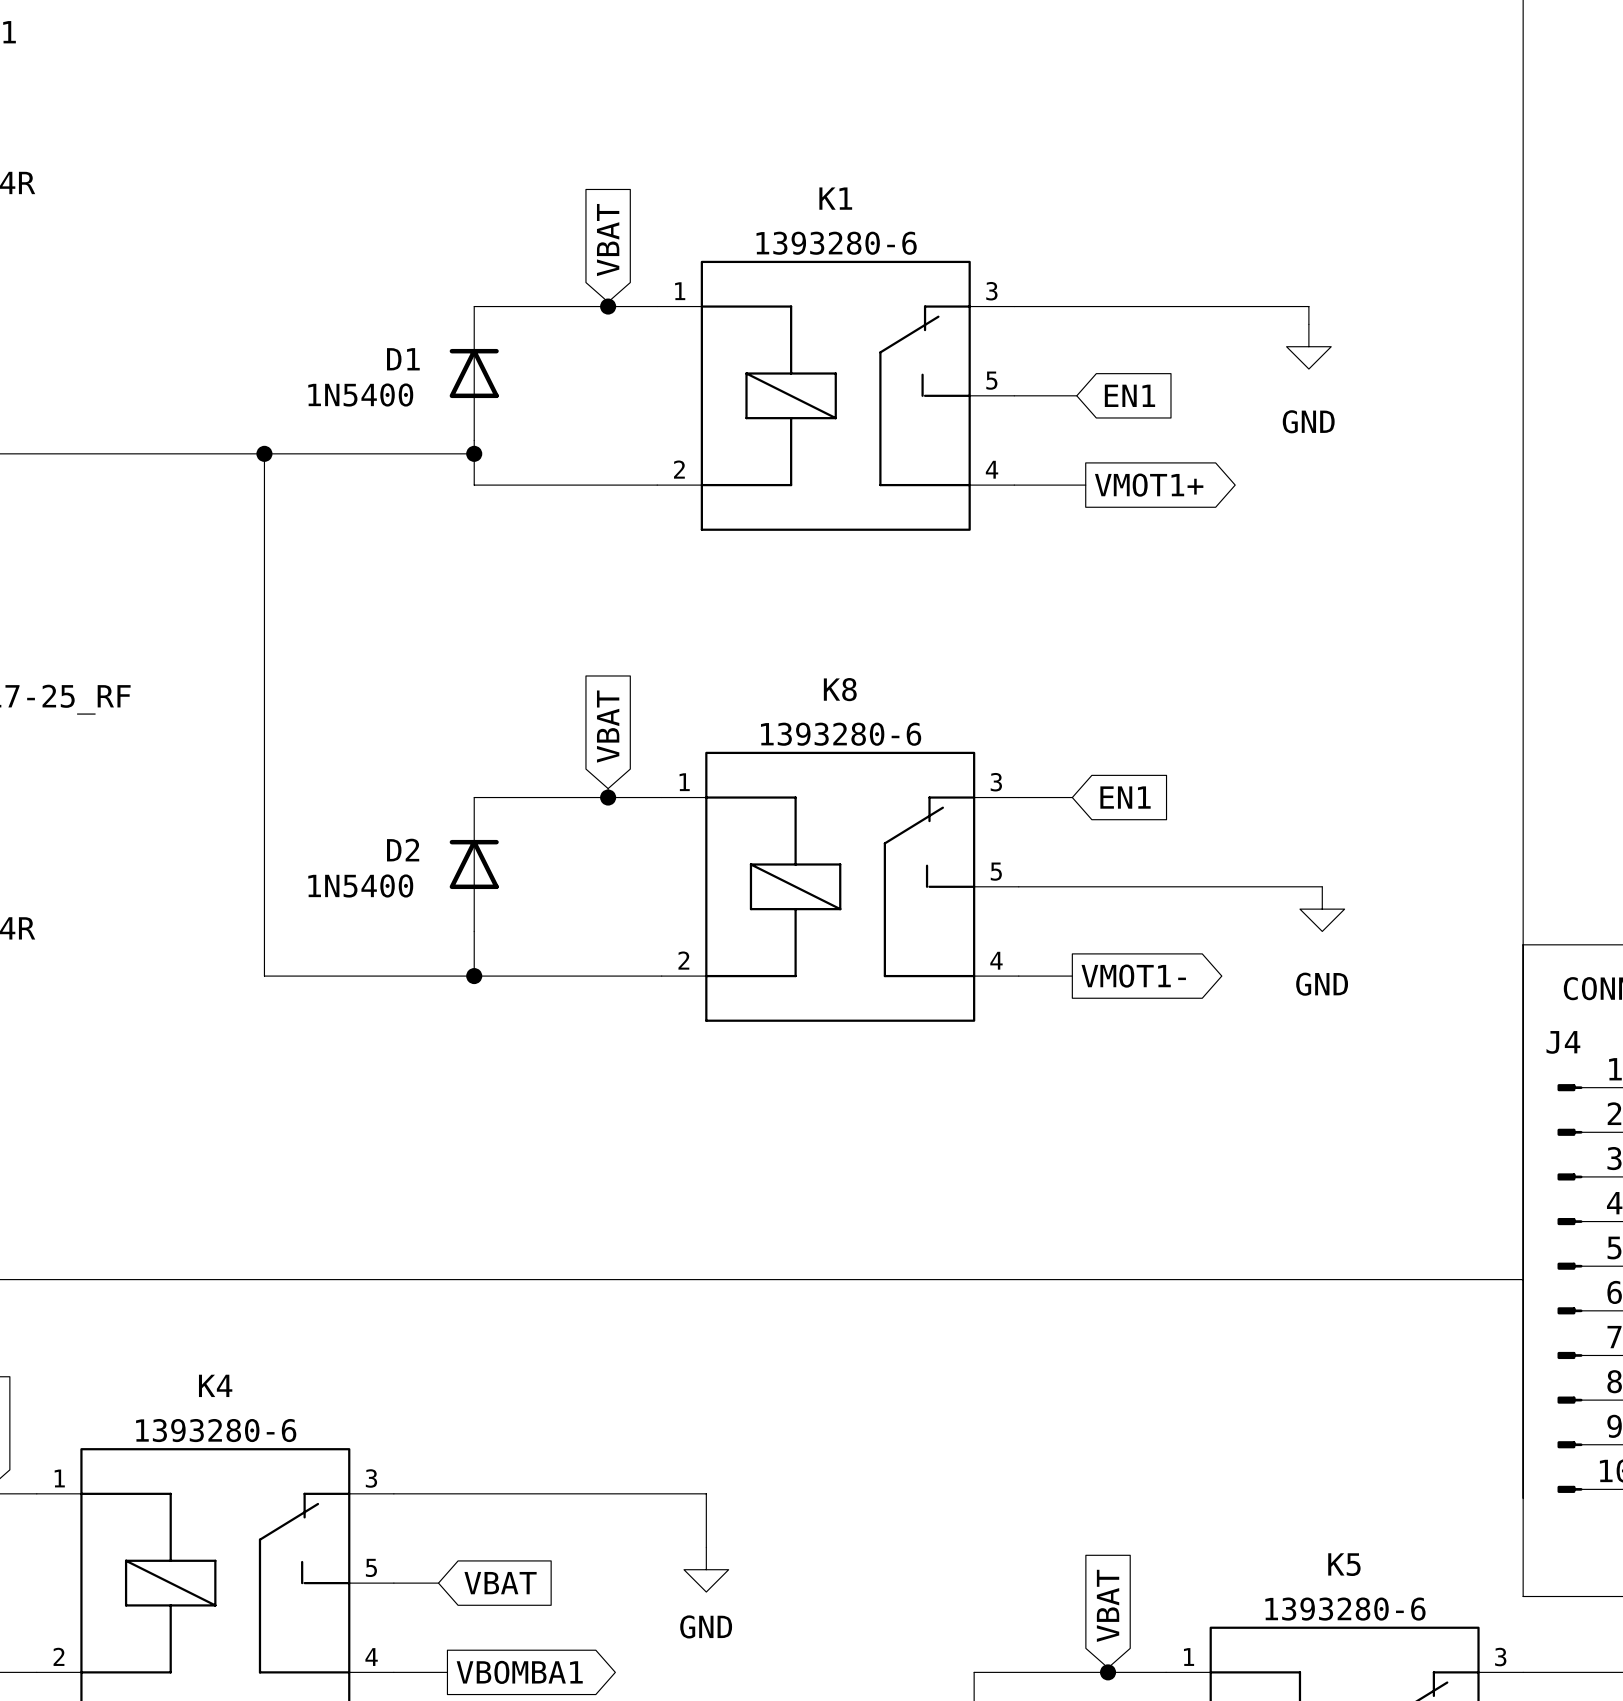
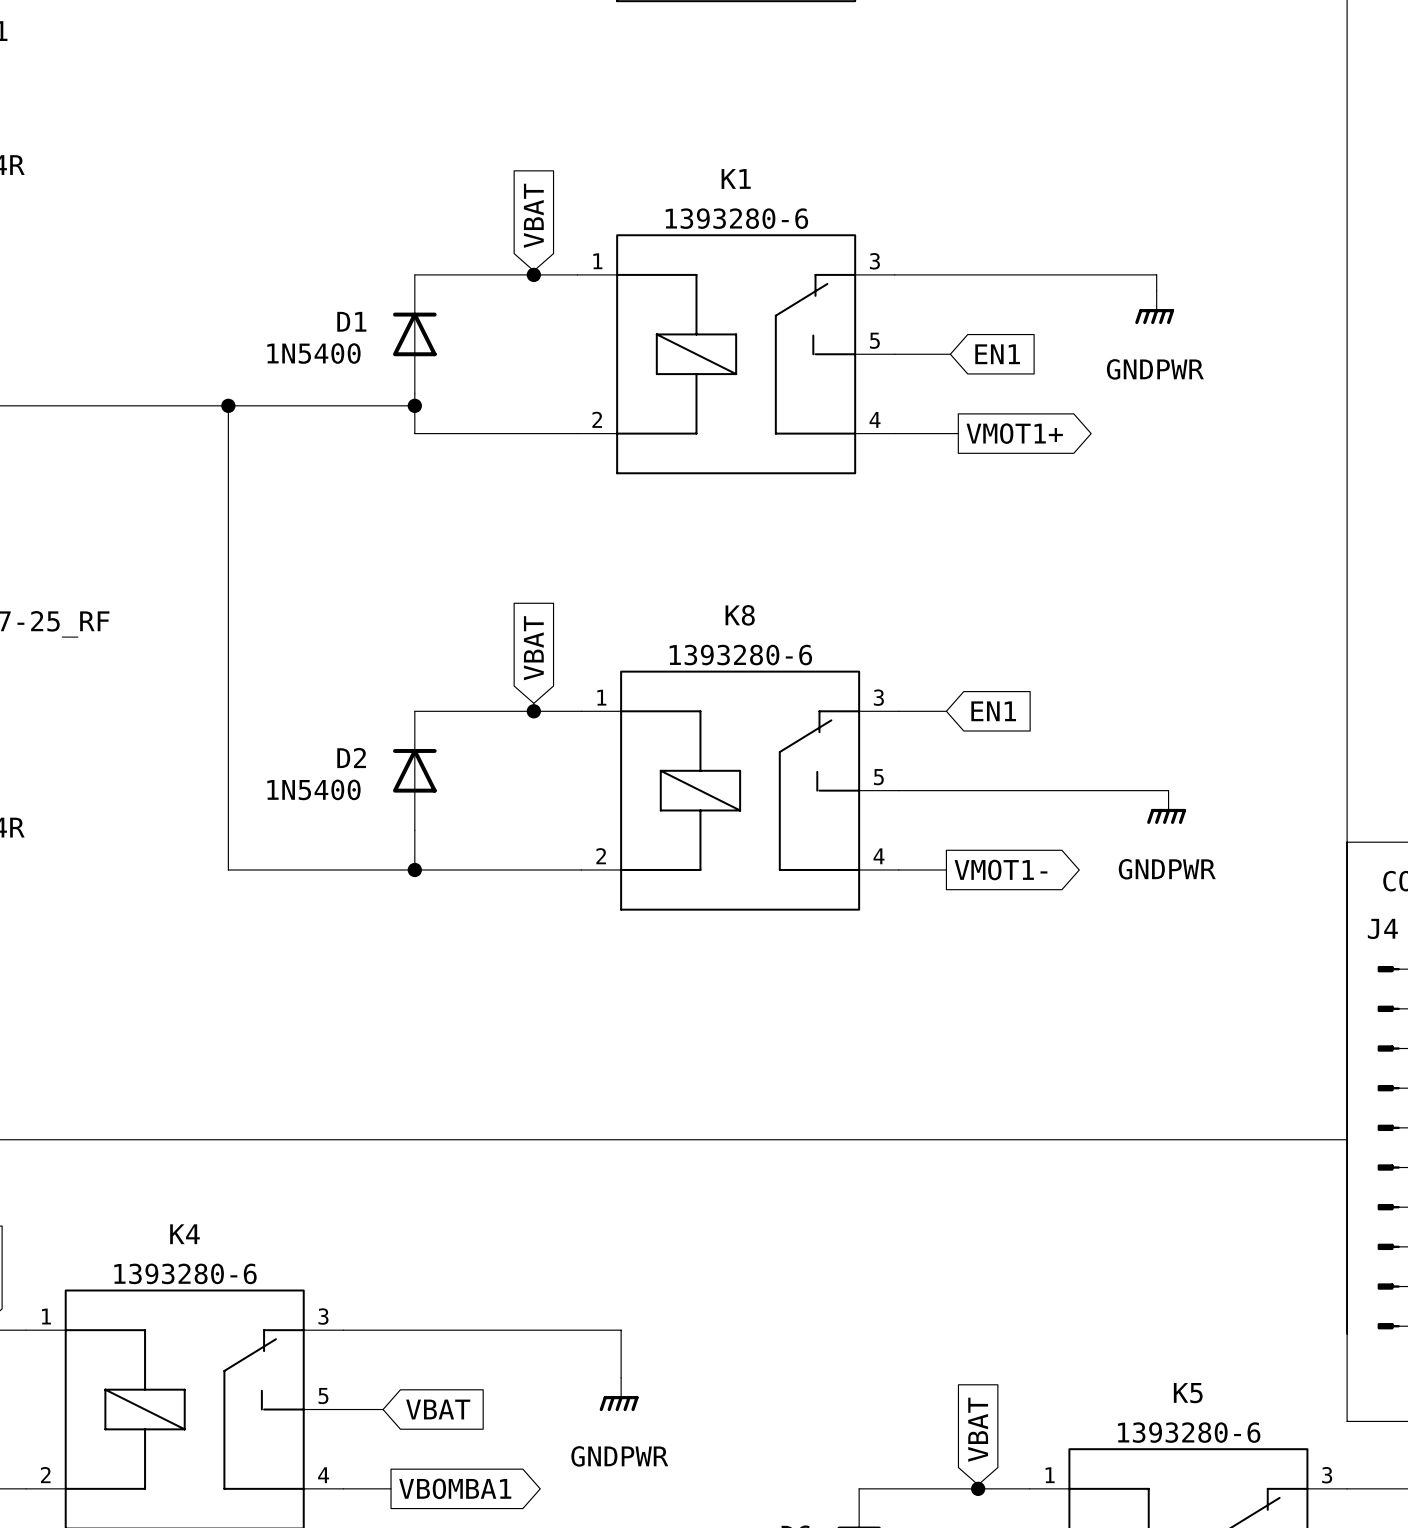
power symbol: GND (1308, 346) -> GNDPWR (1154, 307)
power symbol: GND (1322, 909) -> GNDPWR (1166, 807)
power symbol: GND (706, 1569) -> GNDPWR (619, 1394)

